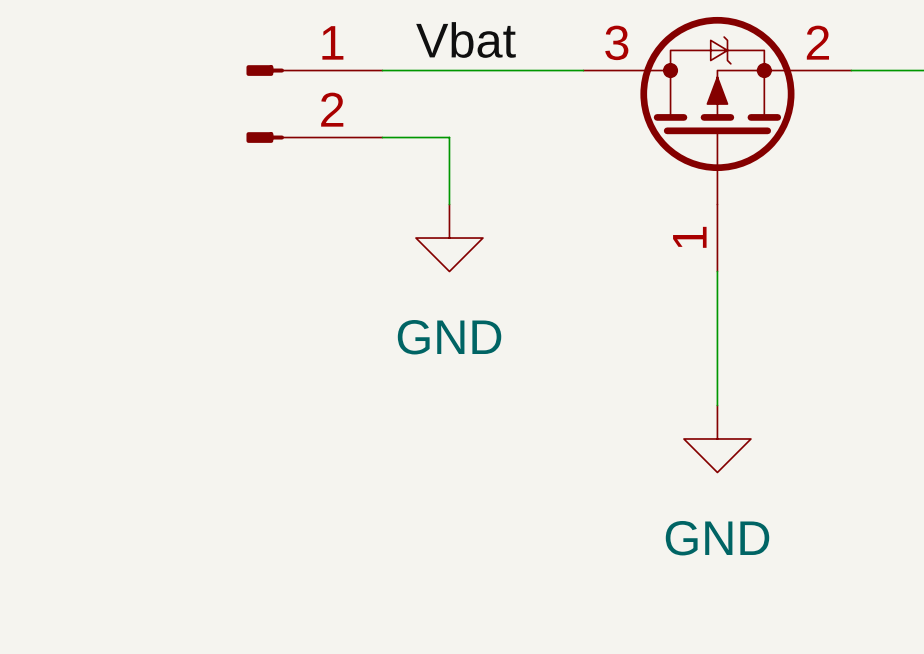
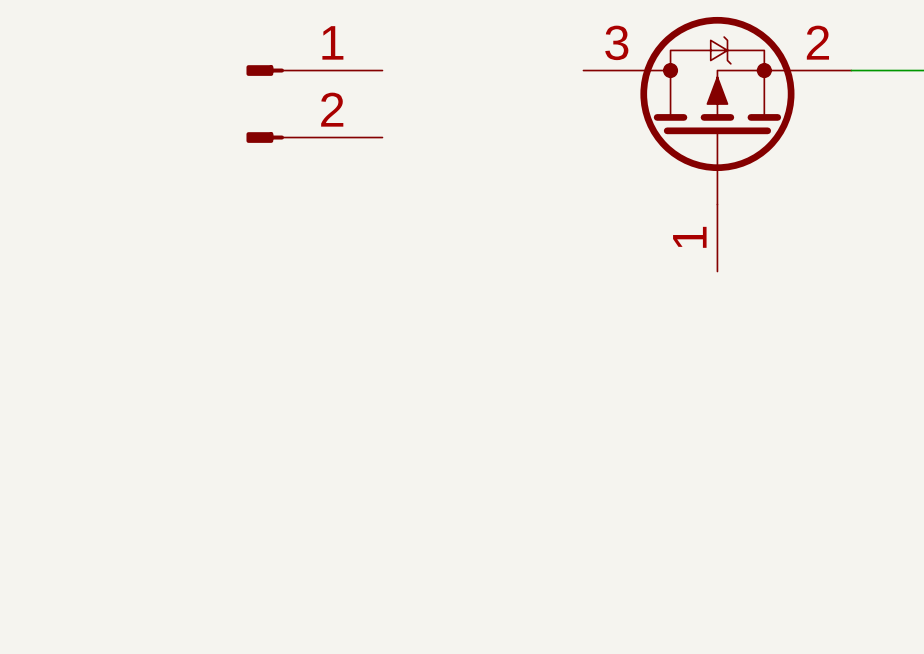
label: Vbat (465, 39) -> none
wire: (382, 70) (583, 70) -> none
wire: (382, 137) (449, 137) (449, 204) -> none
power symbol: GND (449, 238) -> none
wire: (717, 271) (717, 405) -> none
power symbol: GND (717, 438) -> none

